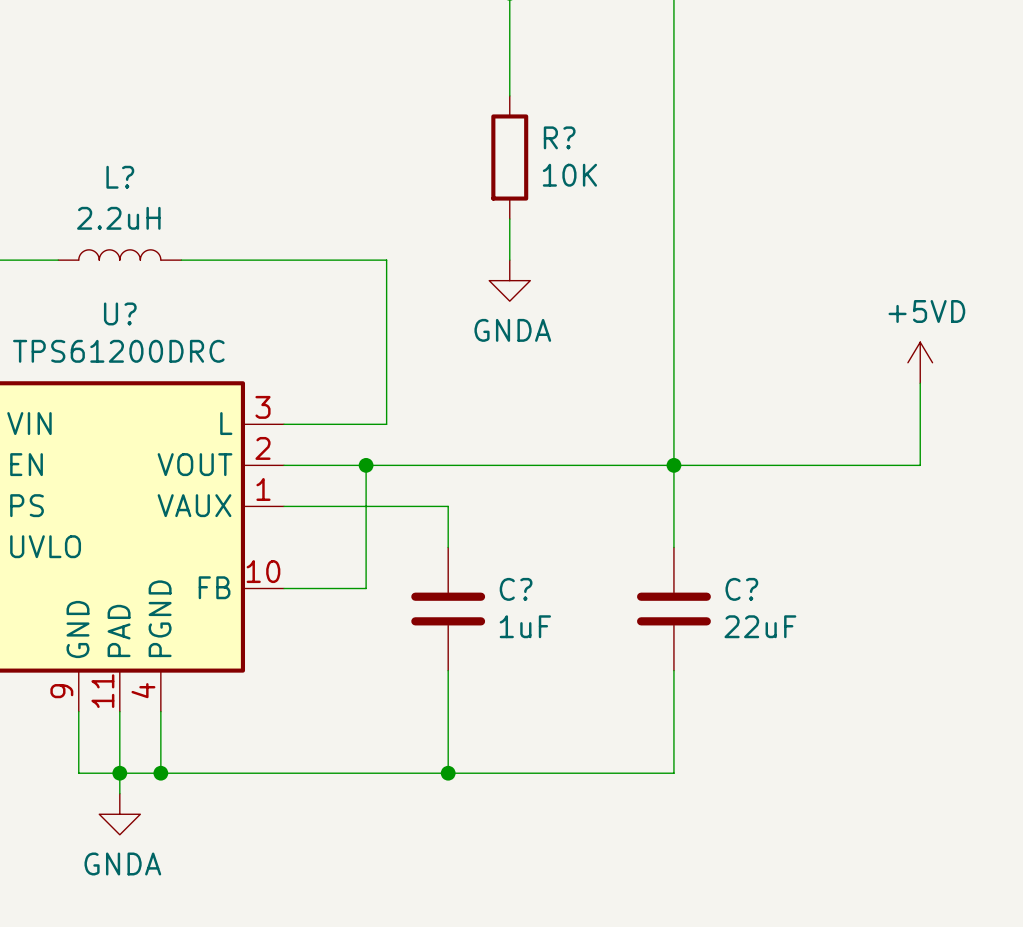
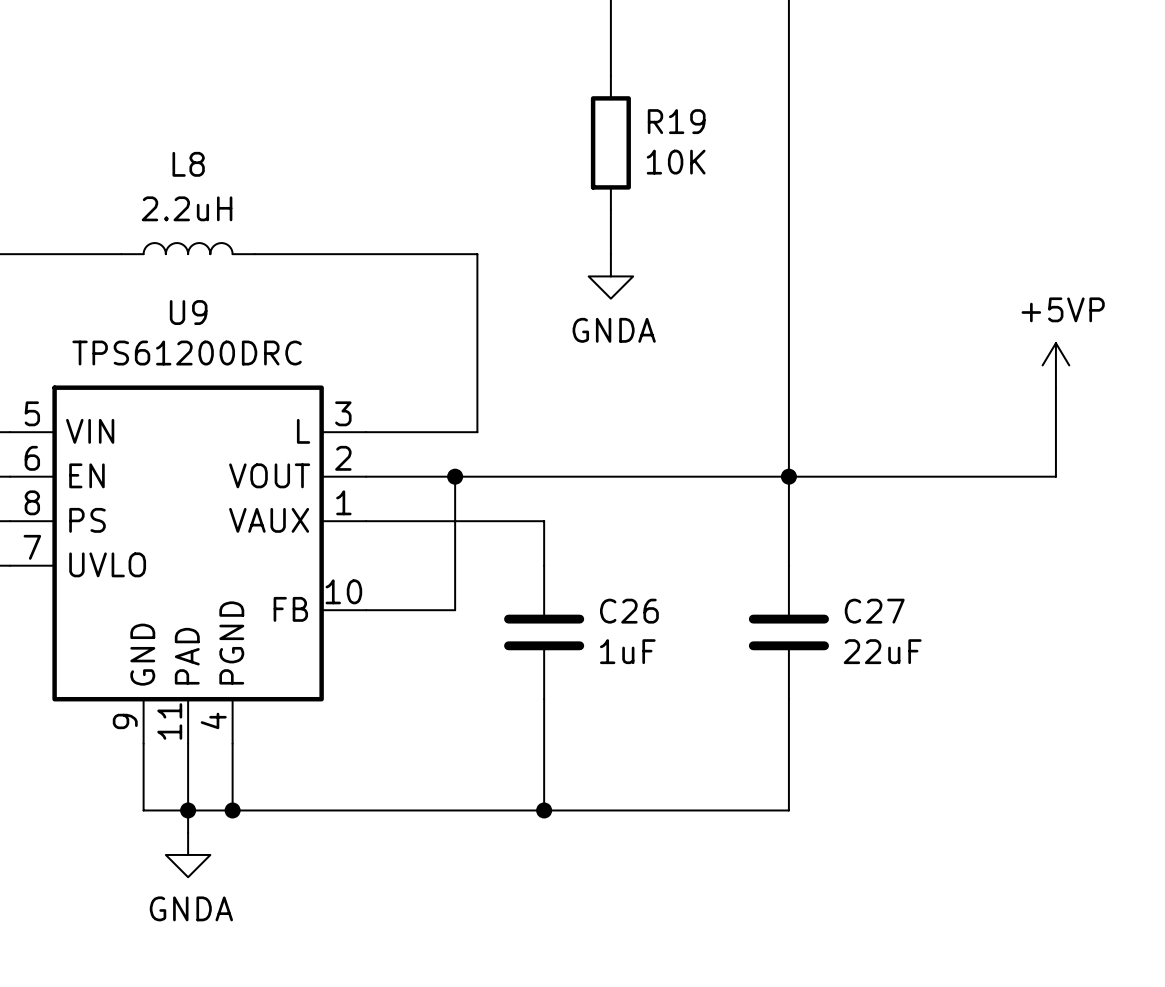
R? name: R? (559, 137) -> R19 (676, 121)
L? name: L? (120, 177) -> L8 (188, 164)
U? name: U? (120, 313) -> U9 (188, 312)
power symbol: +5VD (920, 362) -> +5VP (1055, 365)
C? name: C? (516, 589) -> C26 (629, 611)
C? name: C? (741, 589) -> C27 (874, 611)

